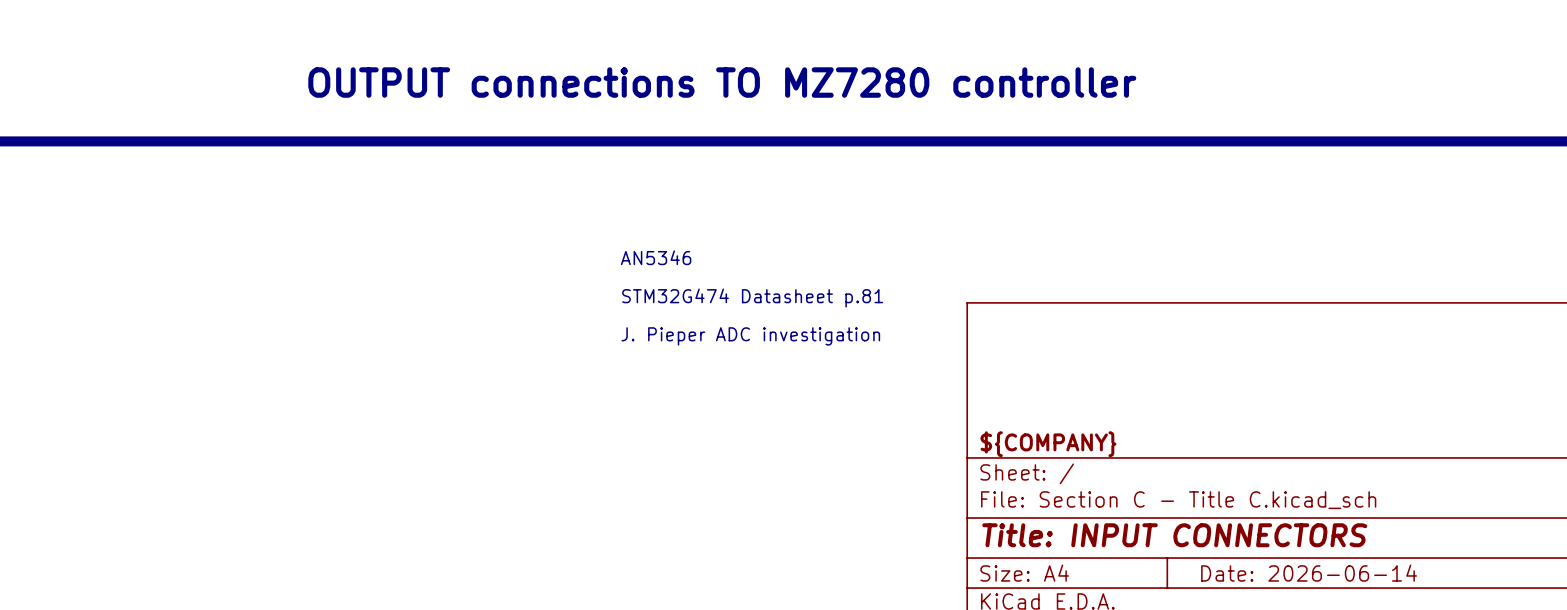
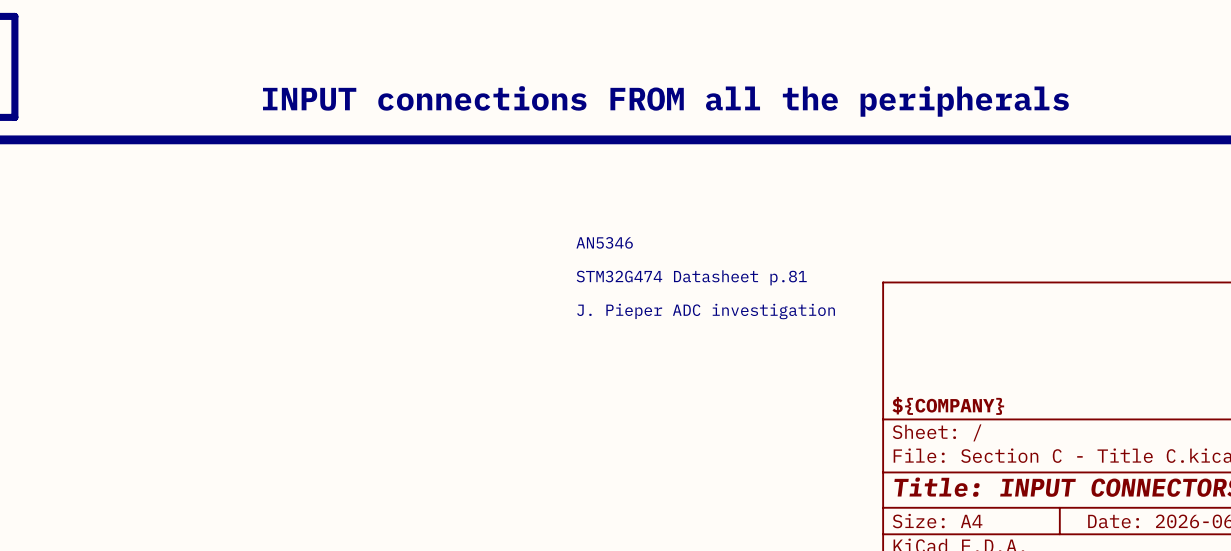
text: OUTPUT connections TO MZ7280 controller (722, 82) -> none
text: none -> INPUT connections FROM all the peripherals (665, 101)

